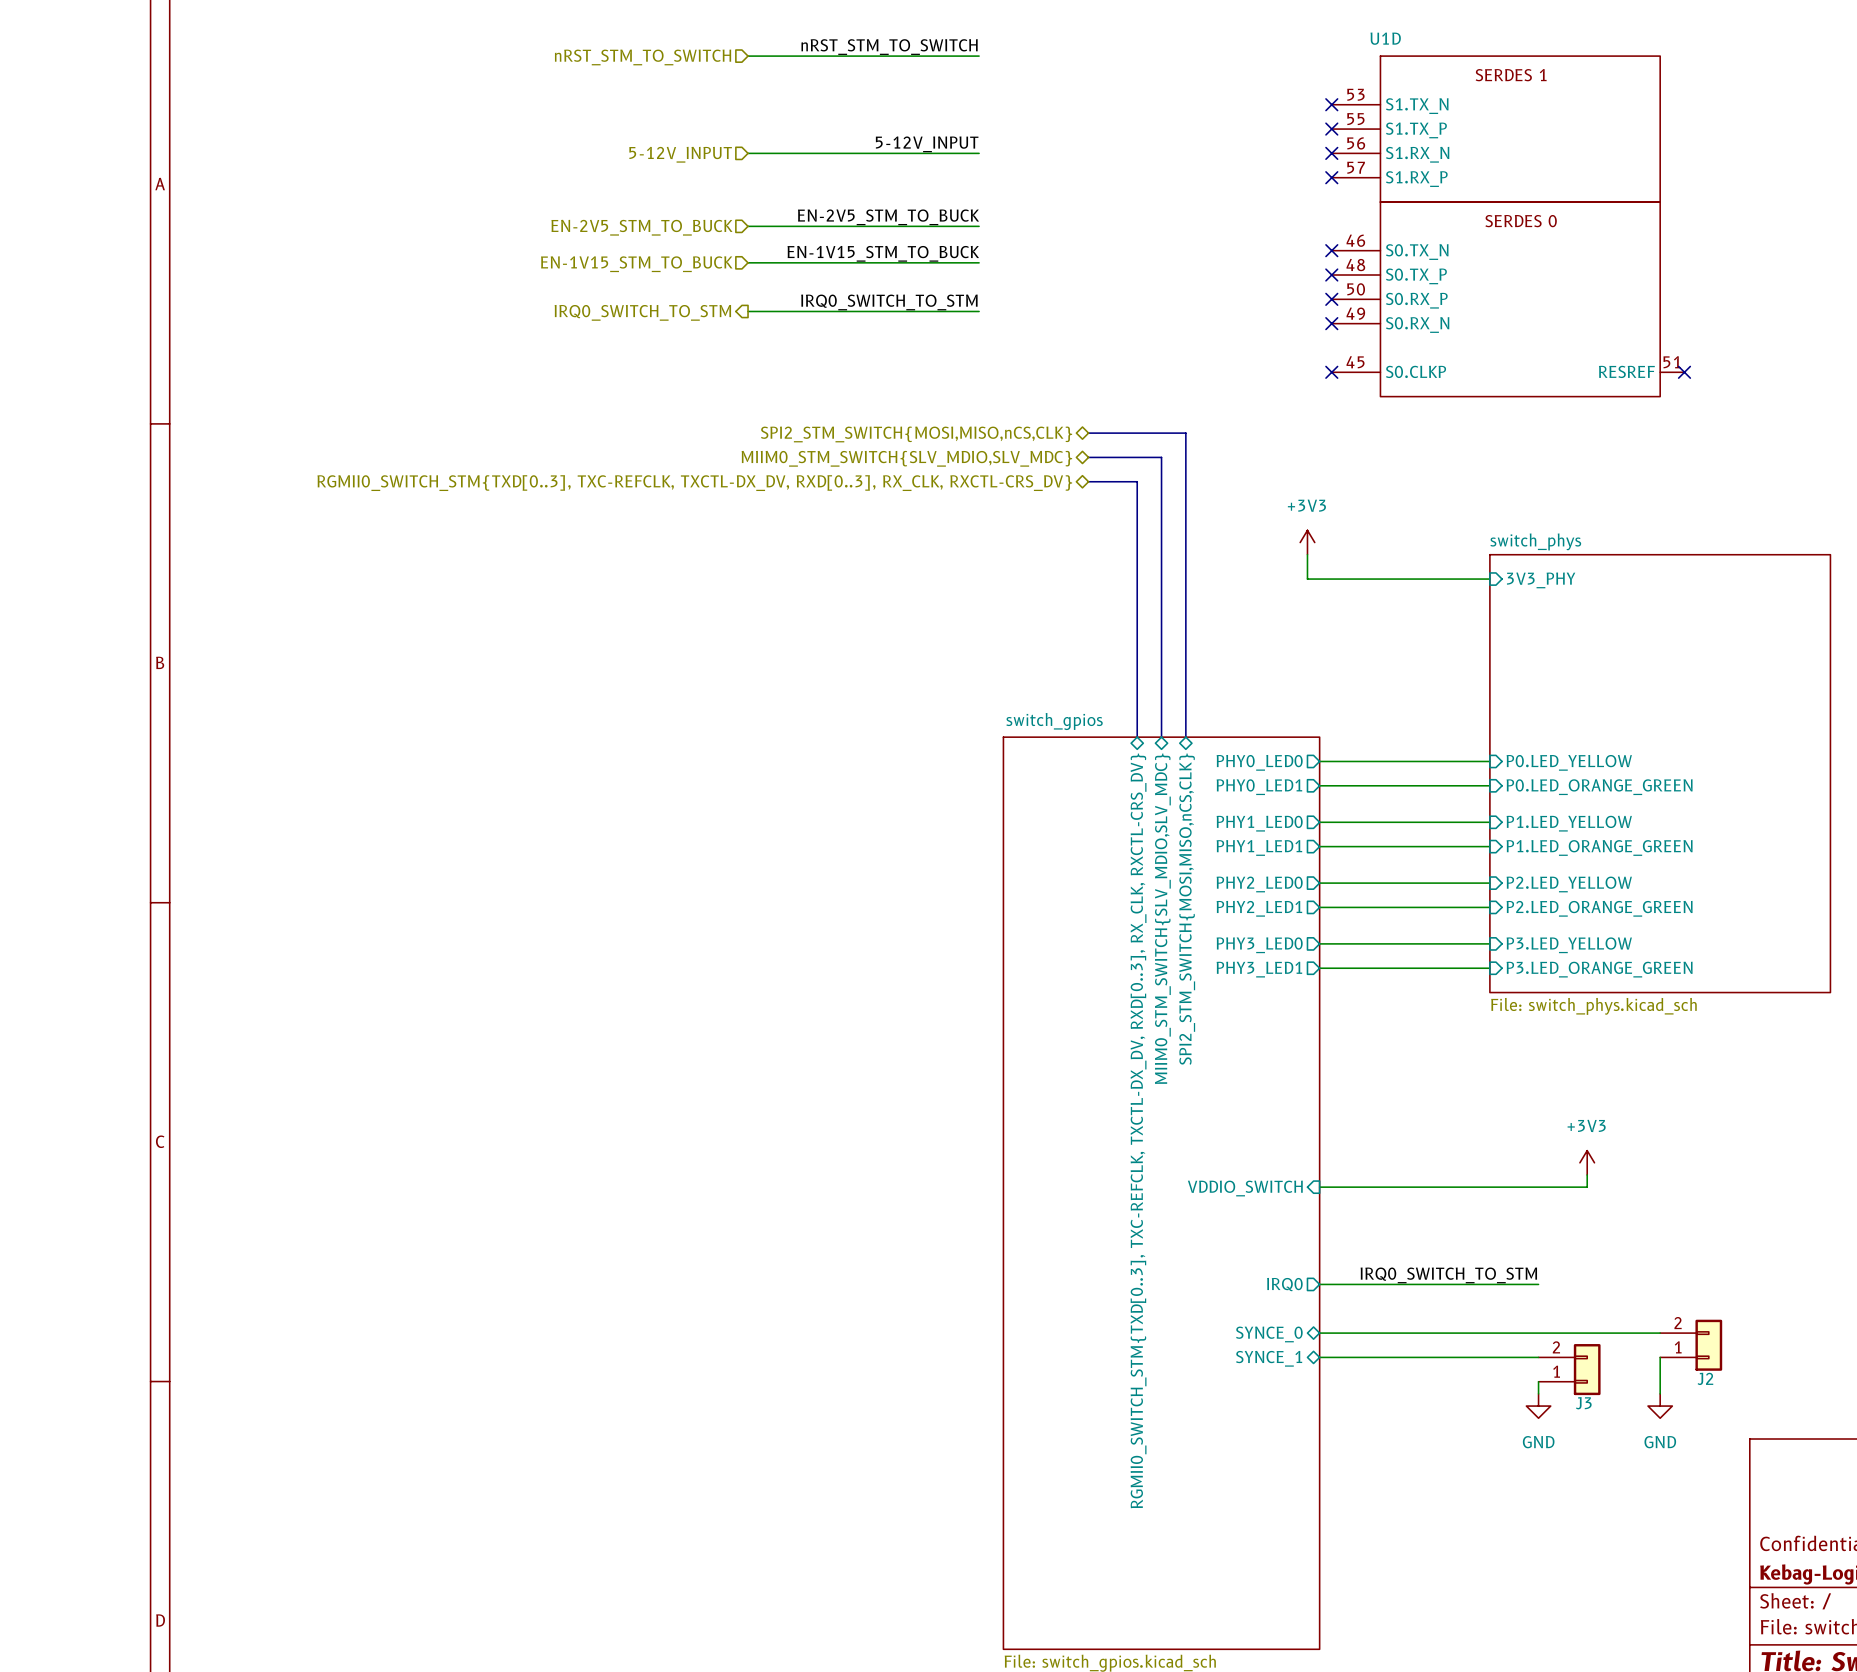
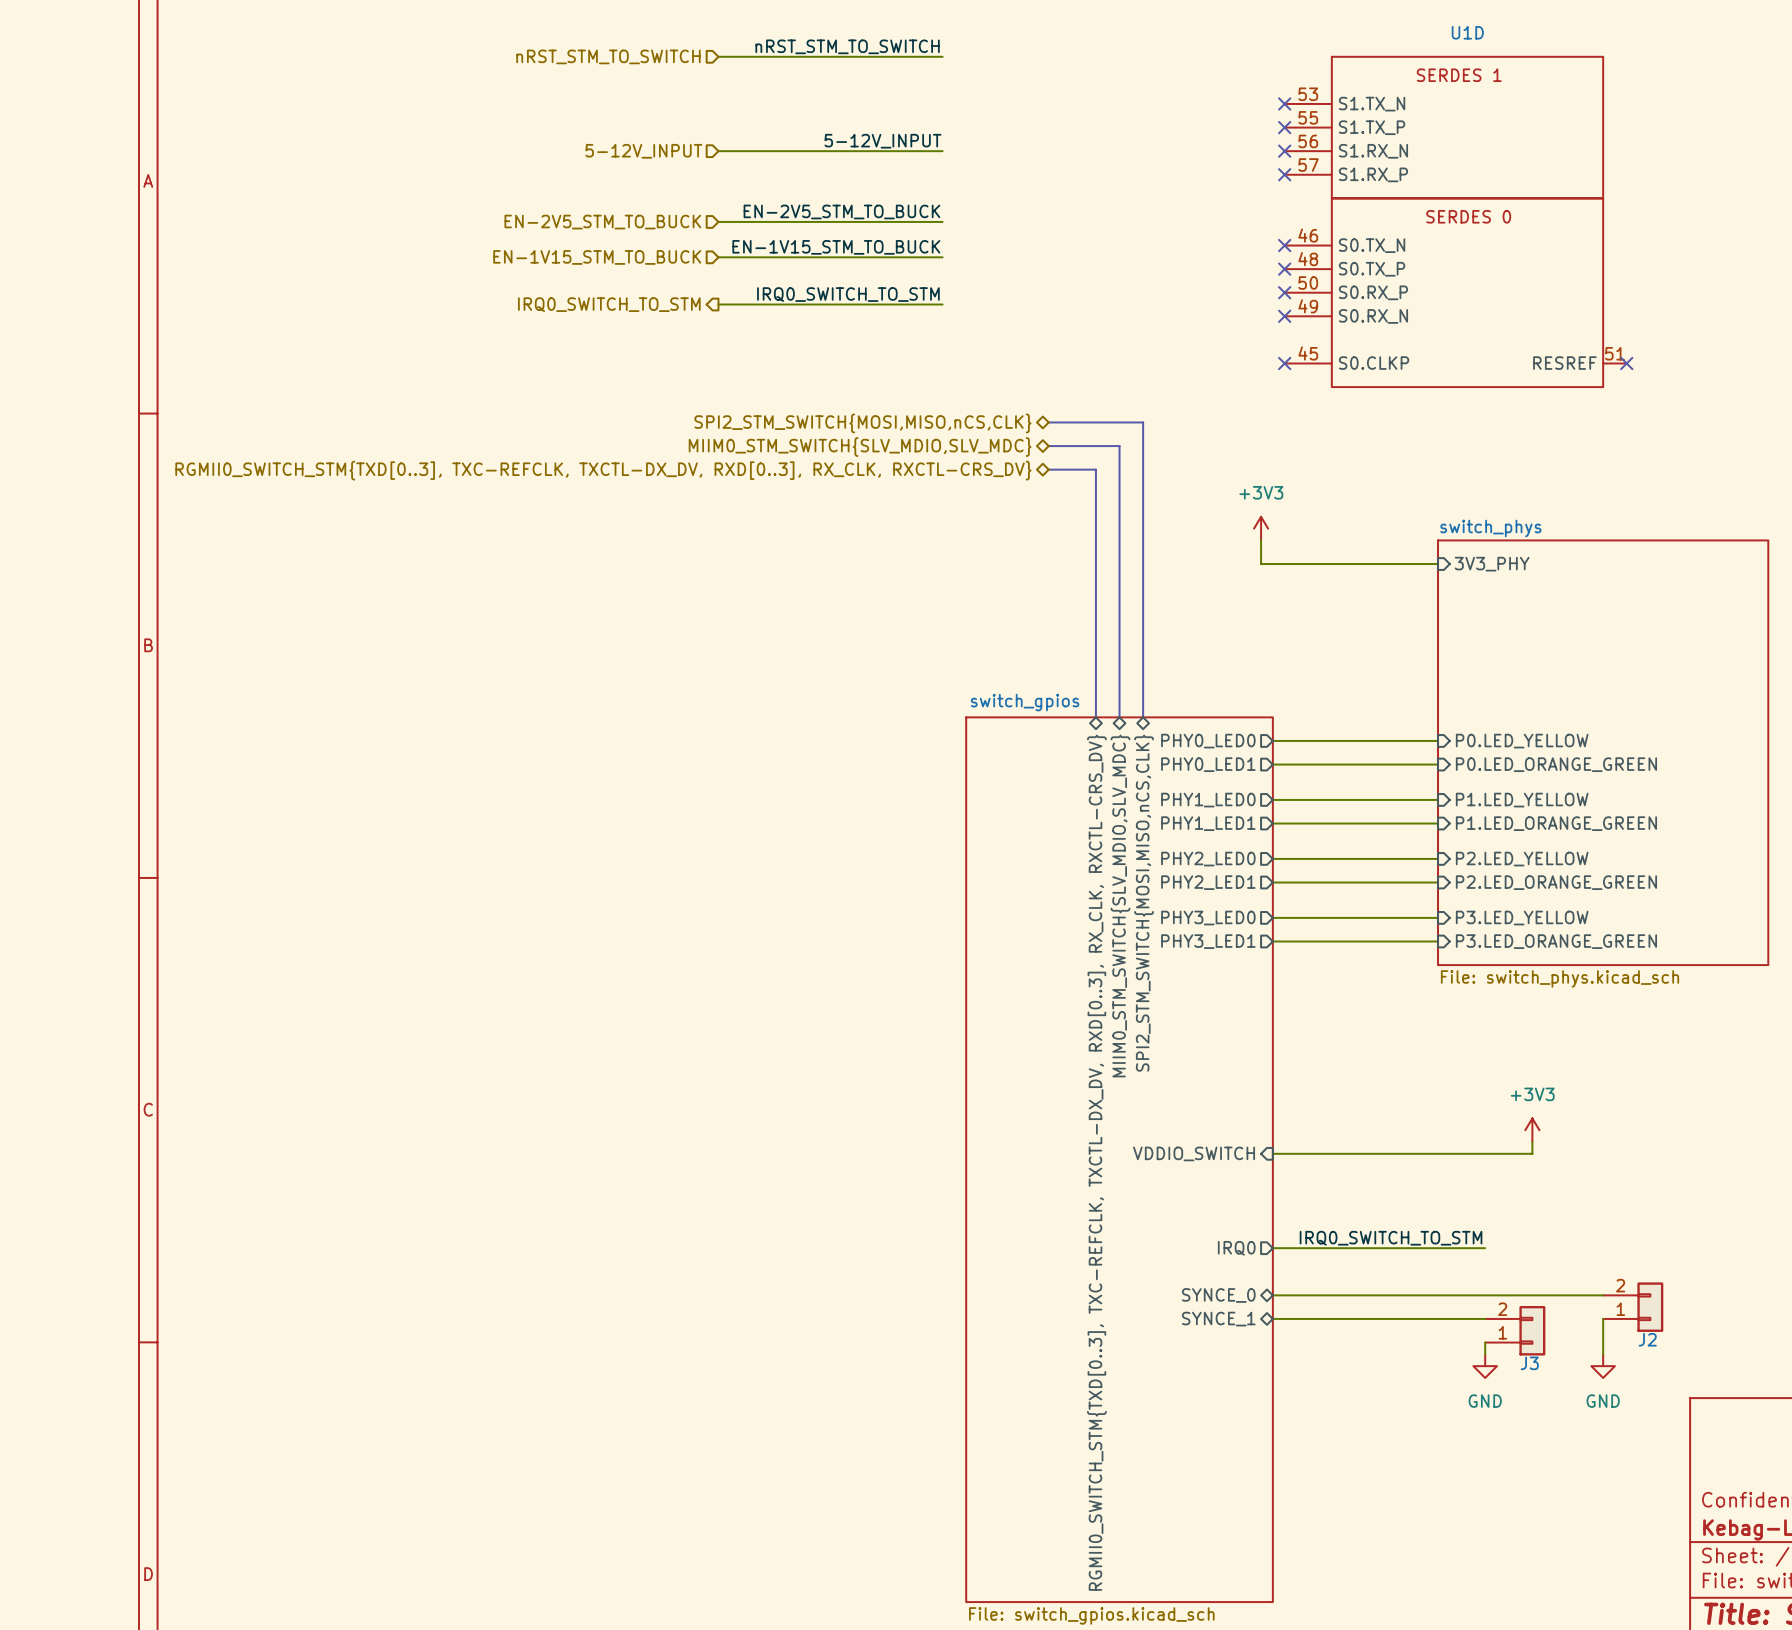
U1D name position: U1D (1385, 38) -> U1D (1467, 32)

